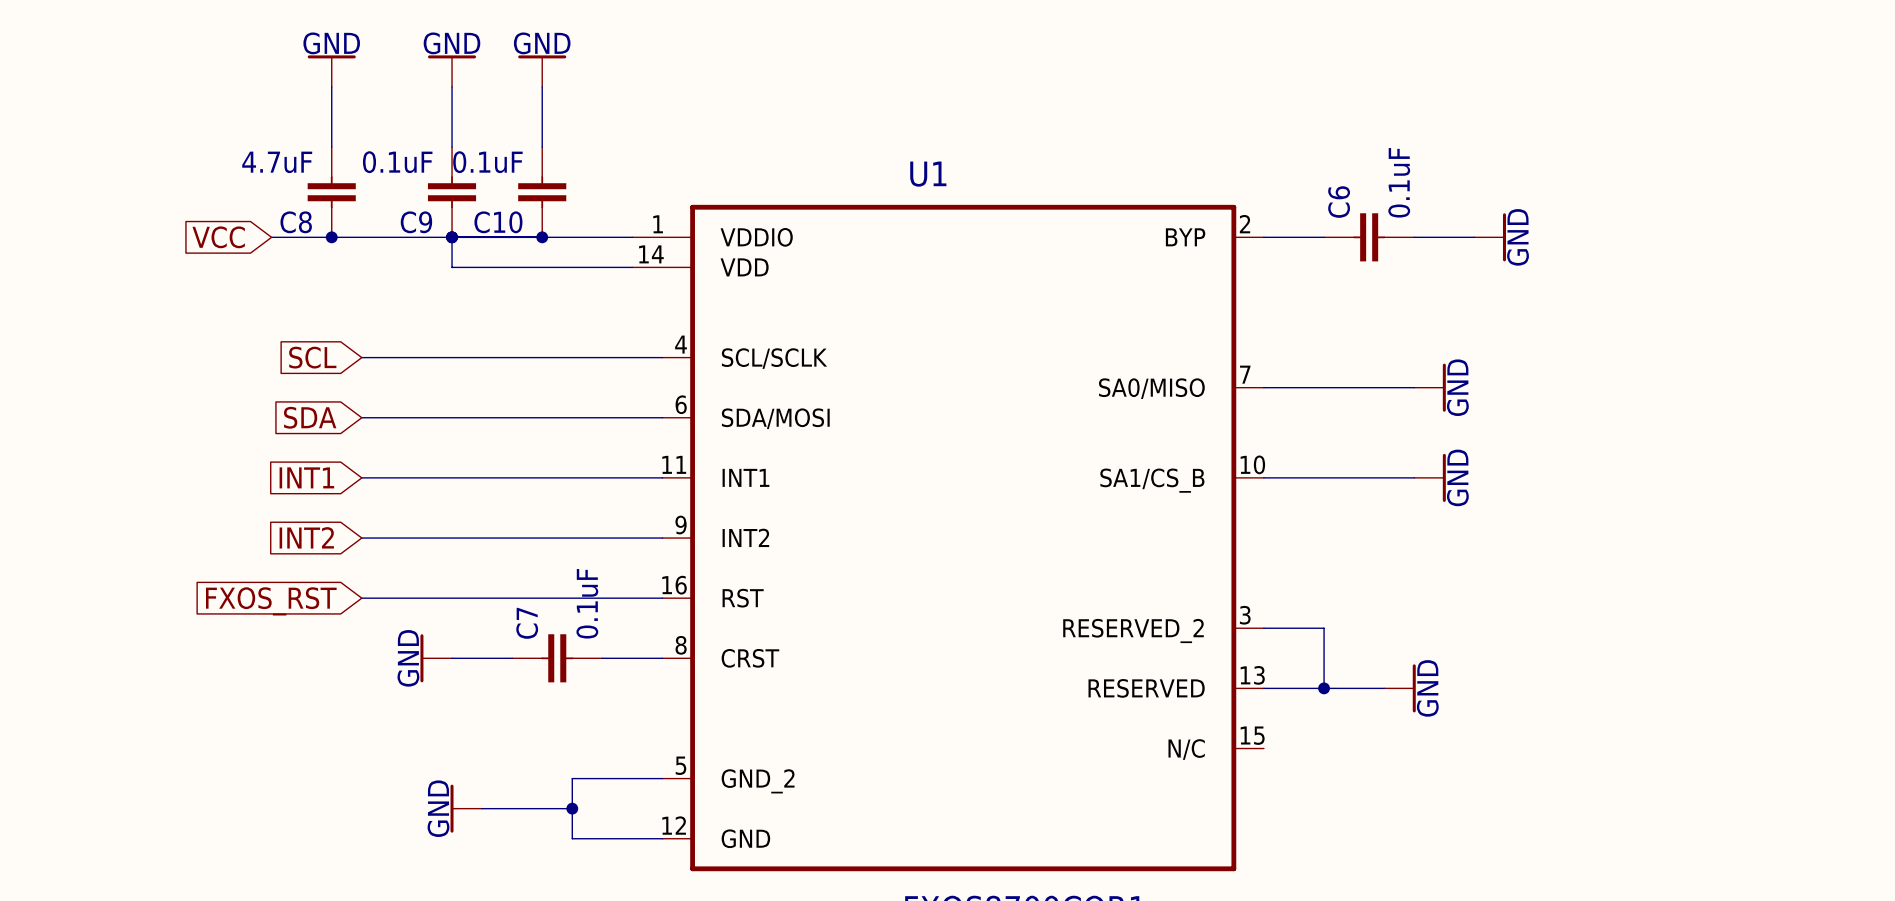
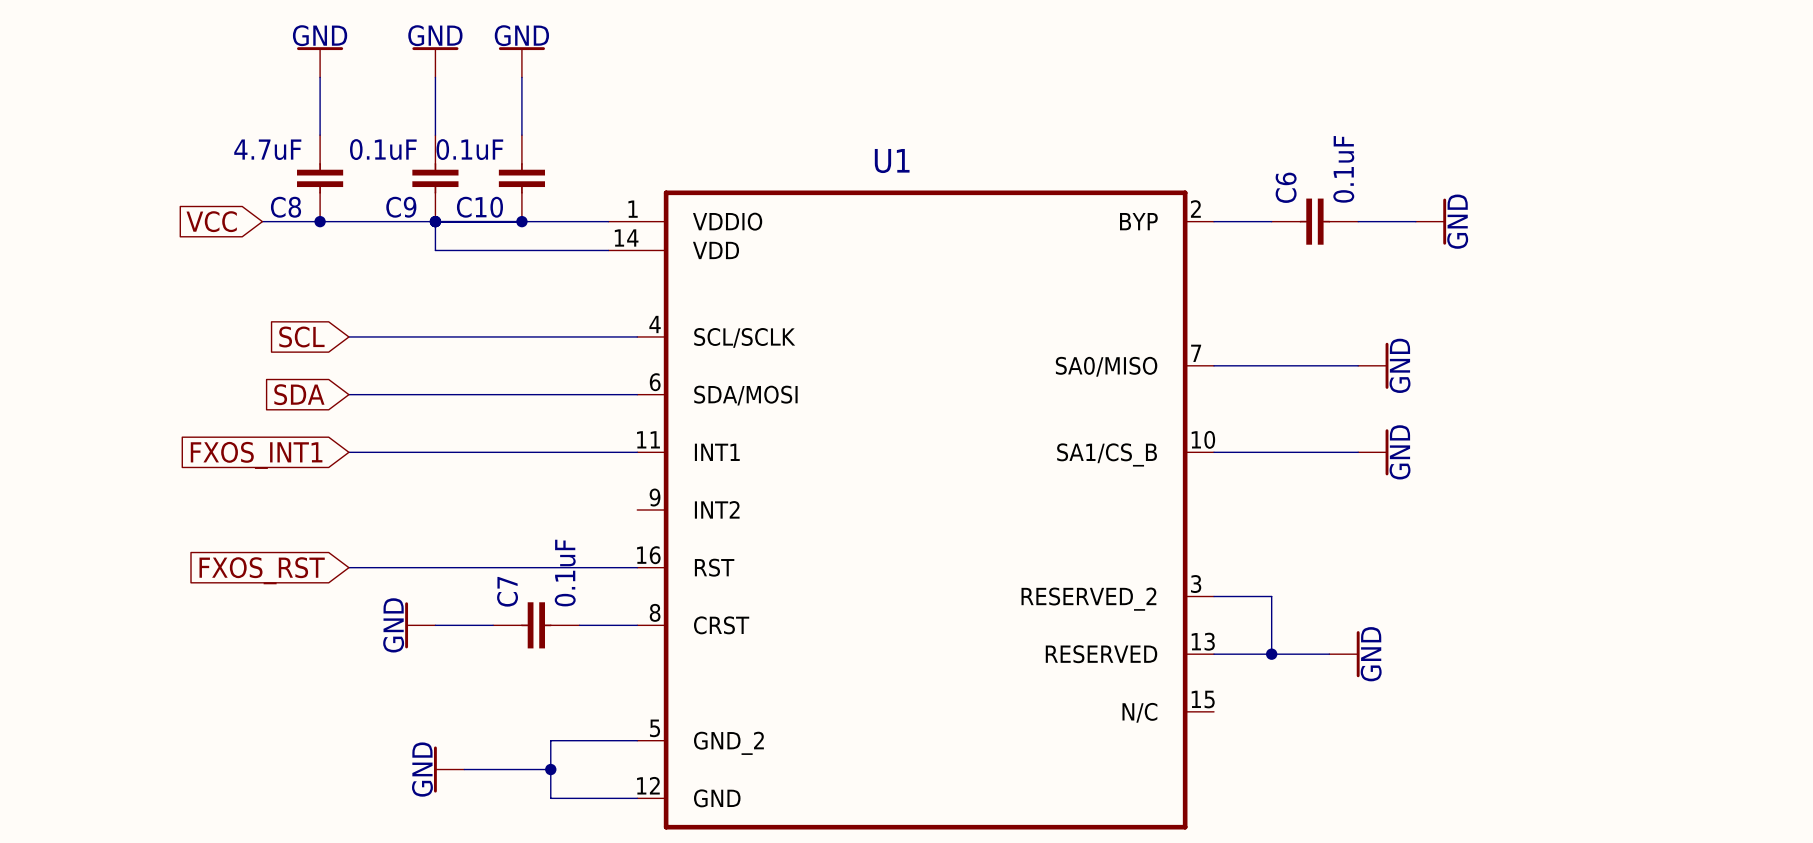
global label: INT1 (306, 477) -> FXOS_INT1 (256, 455)
global label: INT2 (306, 537) -> none
wire: (361, 538) (662, 538) -> none

